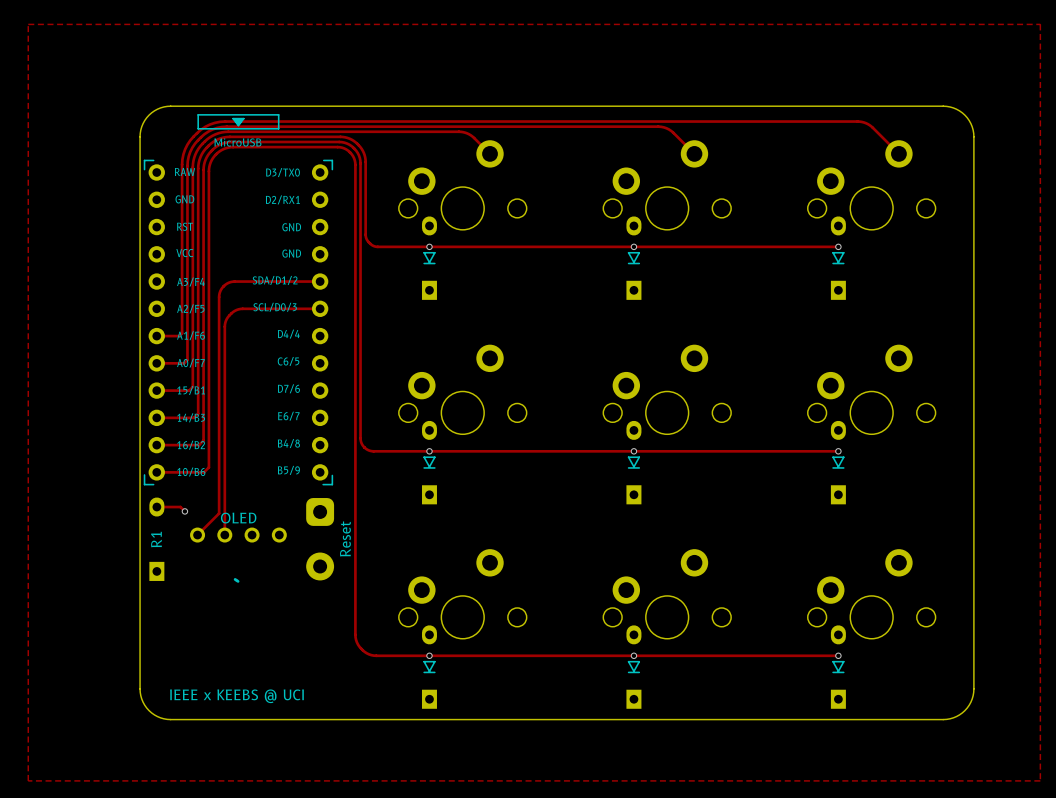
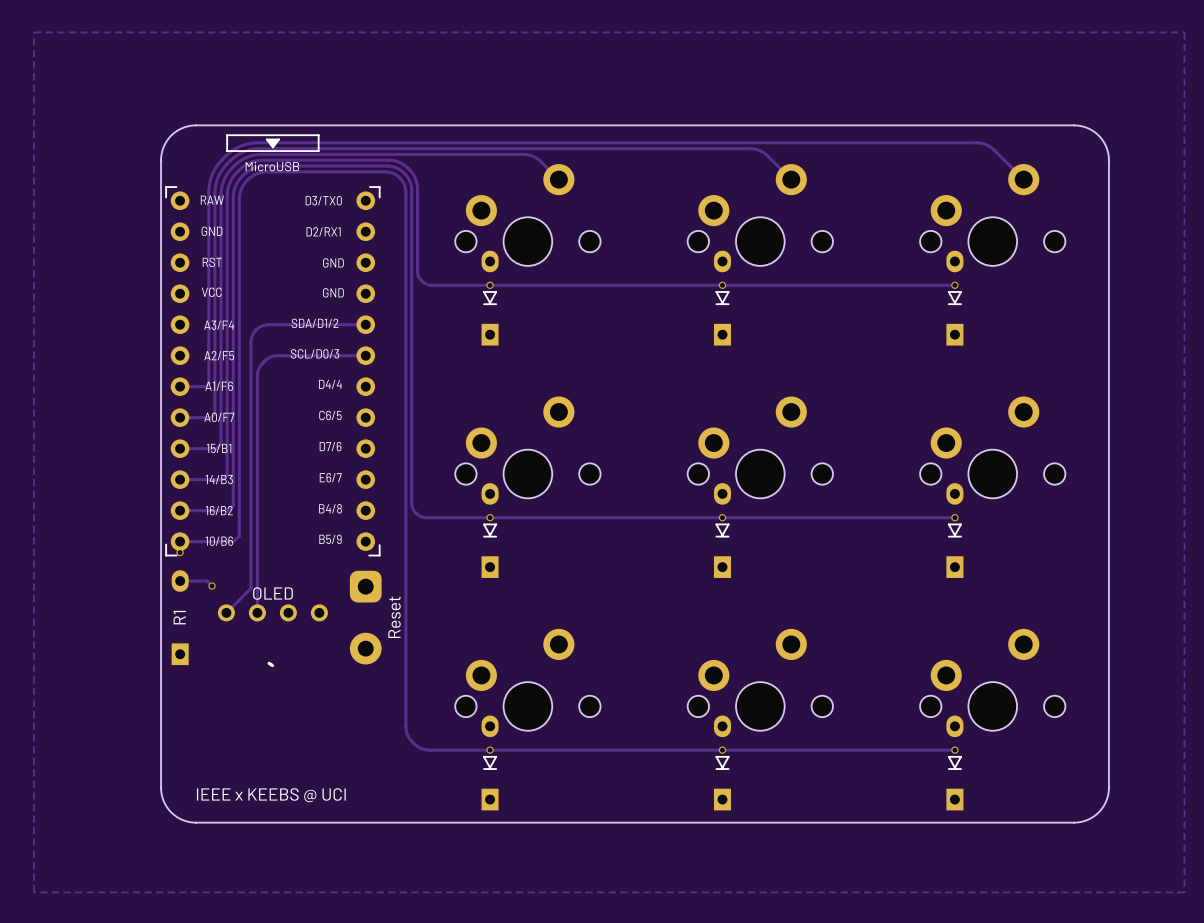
via: none -> (180, 552)

